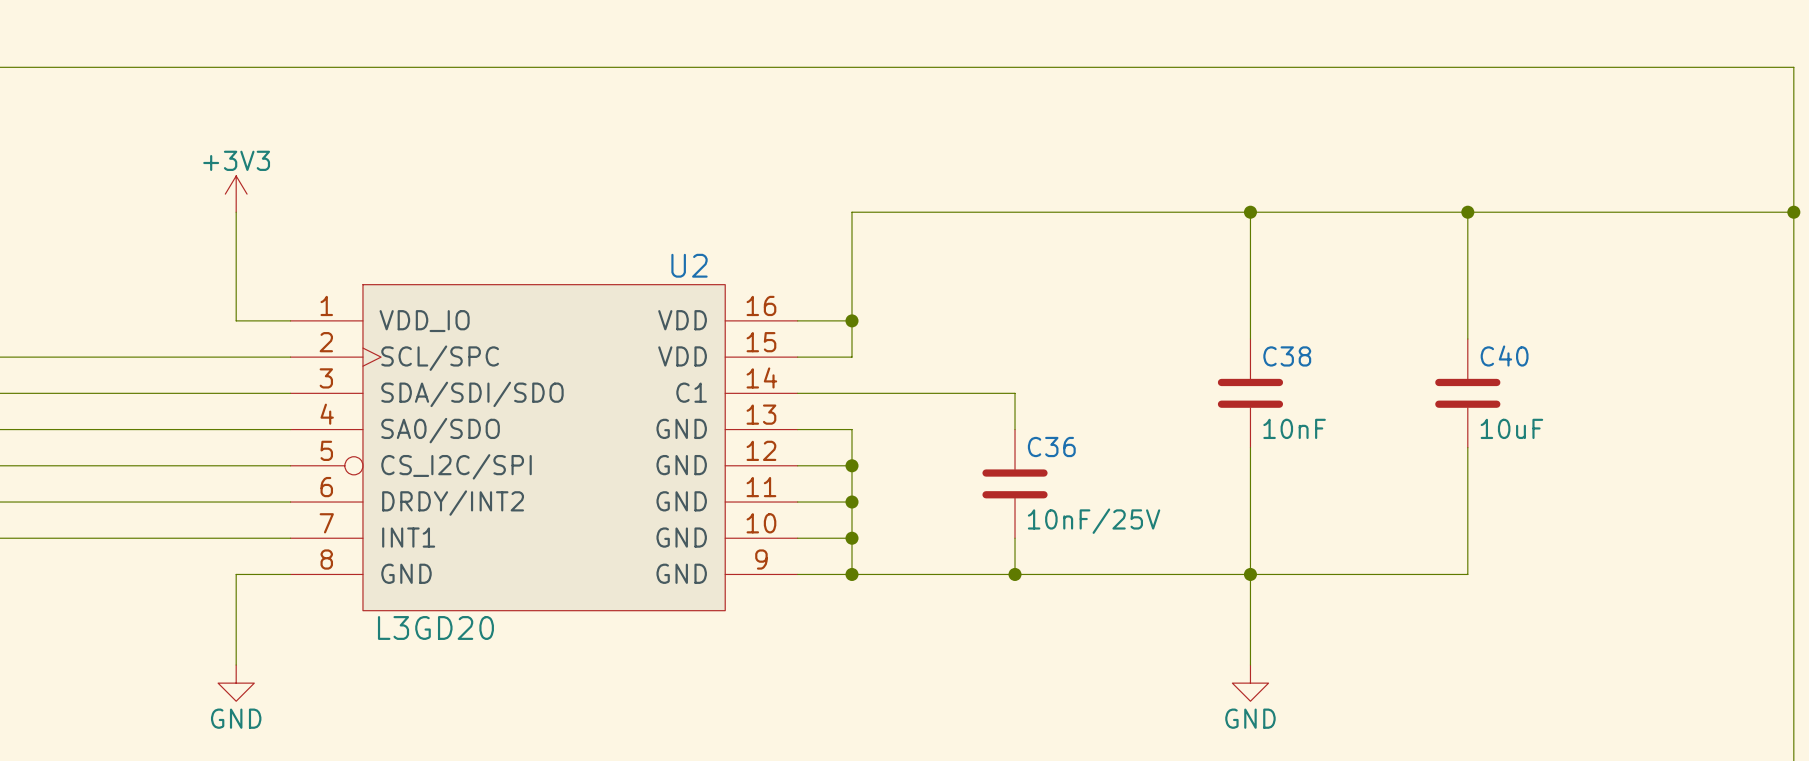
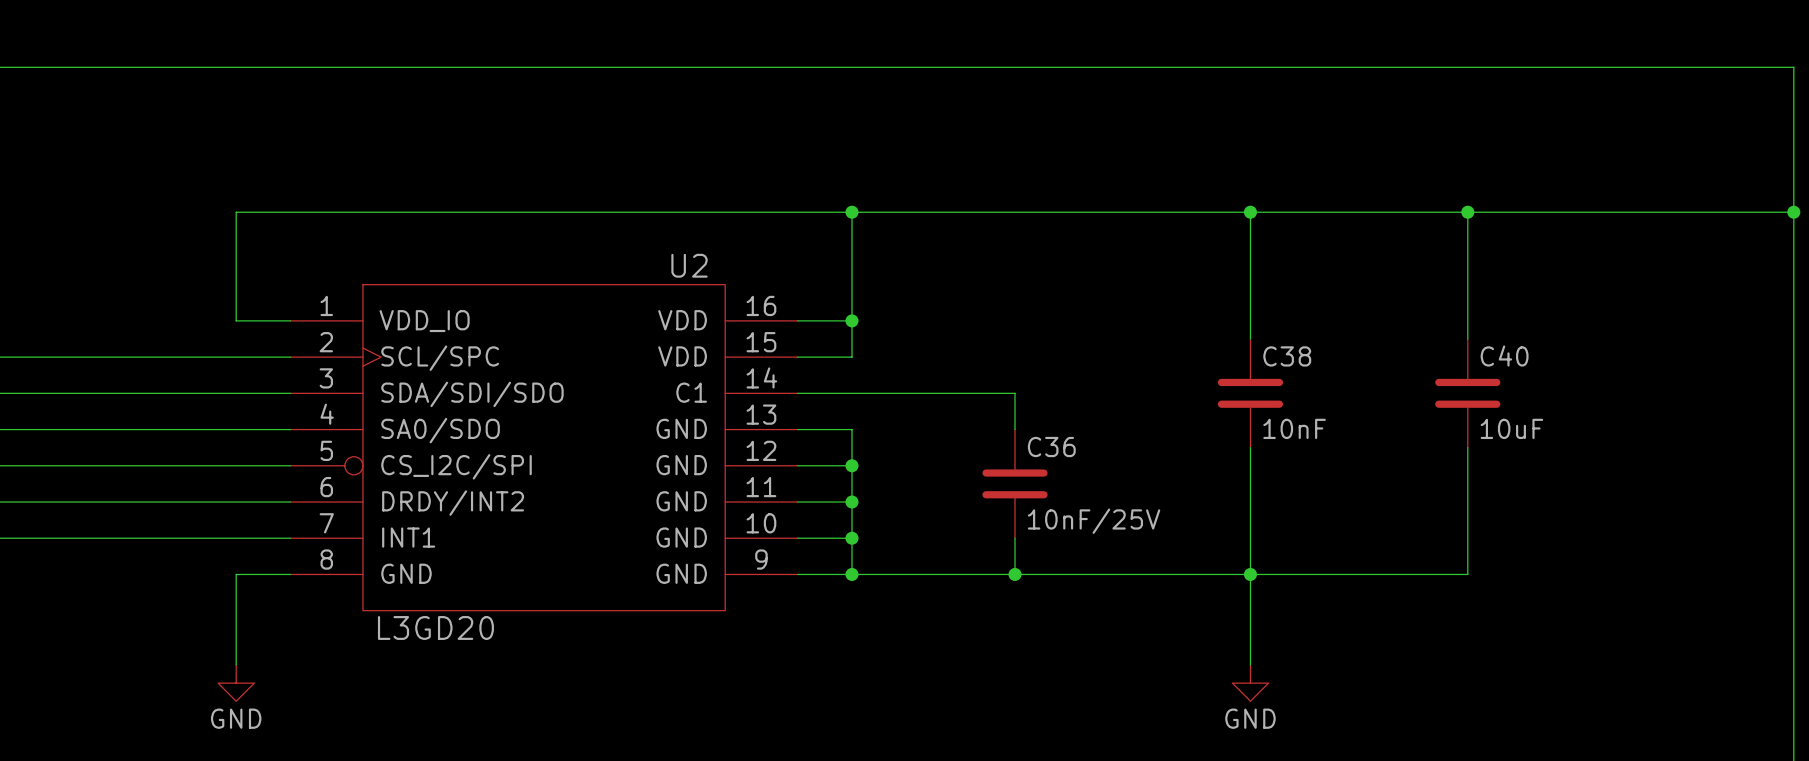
power symbol: +3V3 (236, 194) -> none
wire: none -> (236, 212) (852, 212)
junction: none -> (852, 212)

